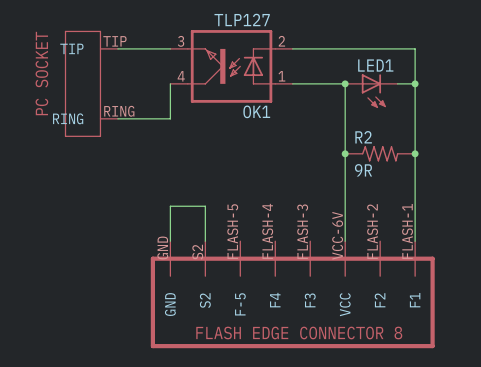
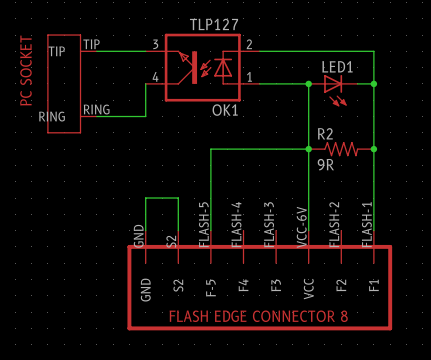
wire: none -> (308, 149) (210, 149) (210, 230)

